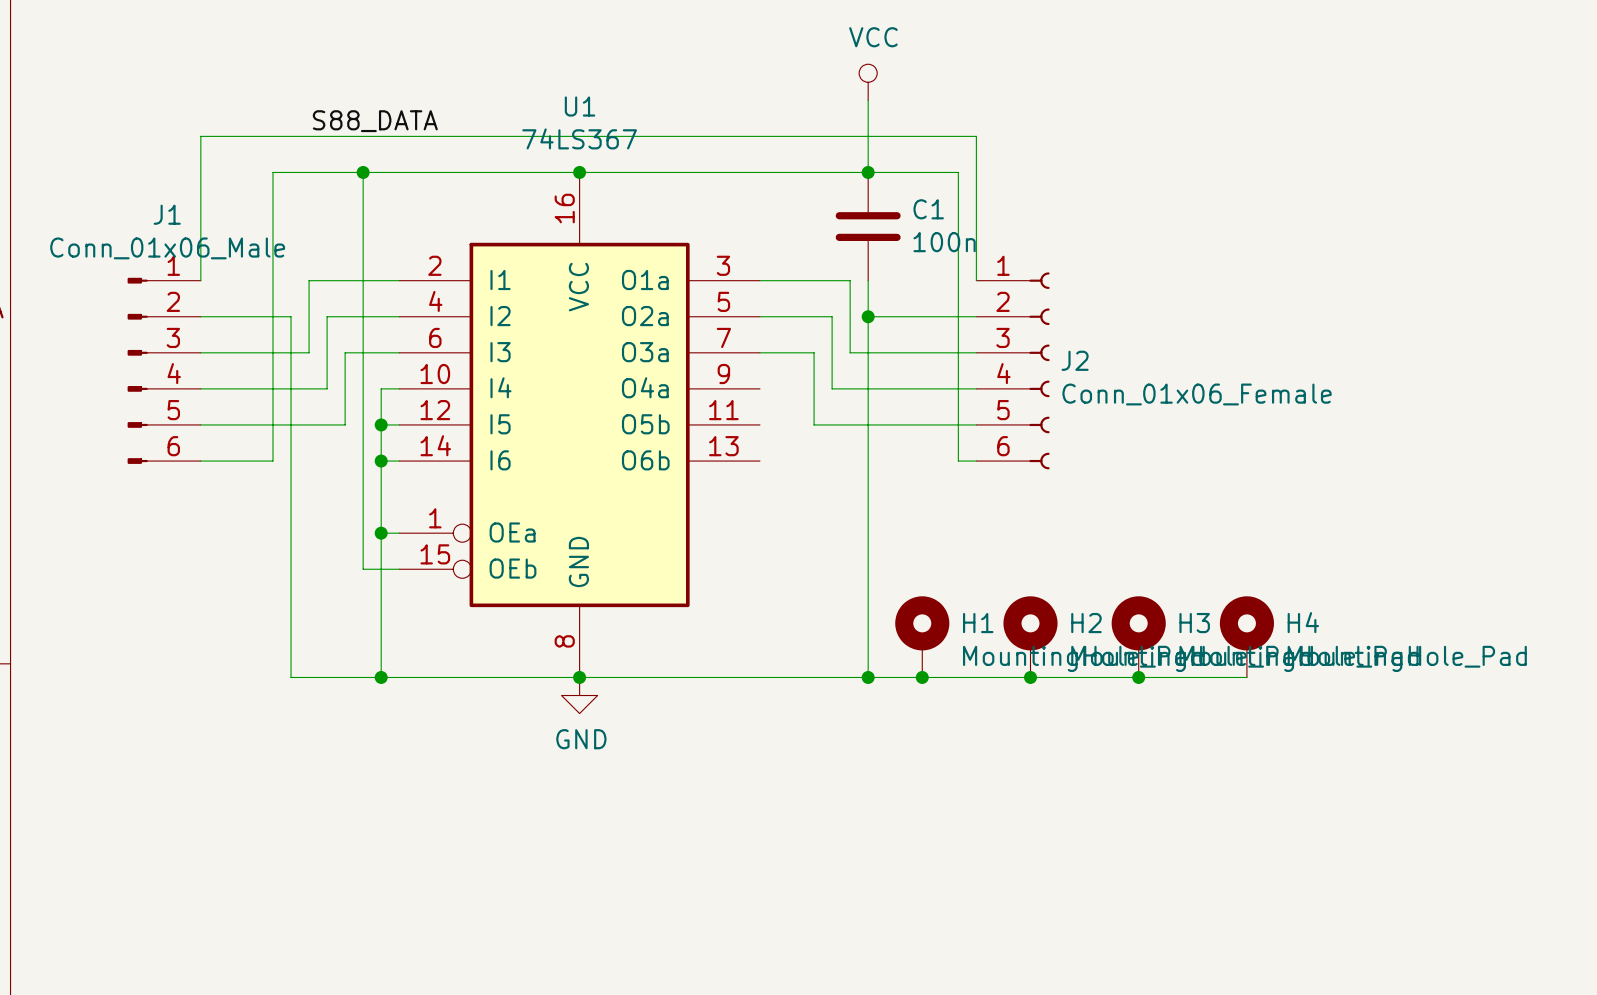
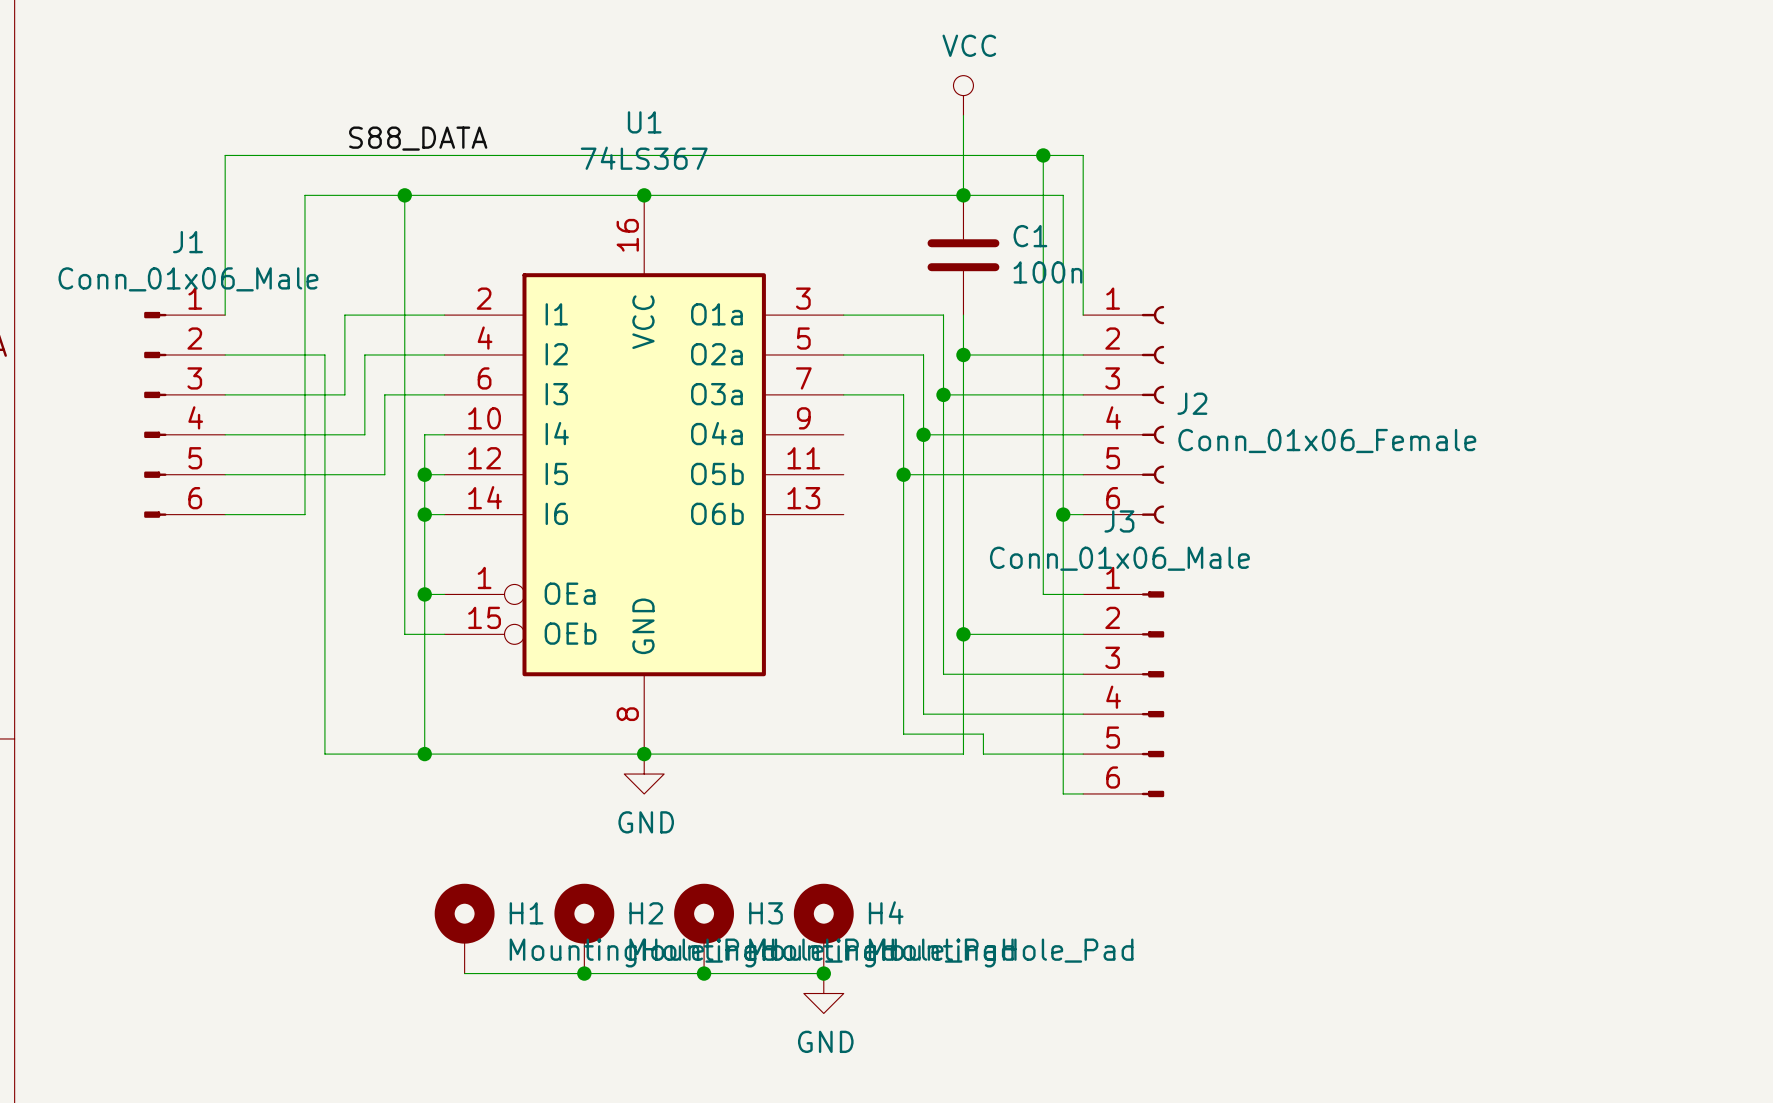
wire: none -> (1043, 155) (1043, 594) (1083, 594)
junction: none -> (1043, 155)
wire: none -> (943, 394) (943, 674) (1083, 674)
junction: none -> (943, 394)
wire: none -> (923, 434) (923, 714) (1083, 714)
junction: none -> (923, 434)
junction: none -> (903, 474)
wire: none -> (1063, 514) (1063, 793) (1083, 793)
junction: none -> (1063, 514)
wire: none -> (963, 634) (1083, 634)
junction: none -> (963, 634)
J3: none -> Conn_01x06_Male (1123, 694)
H1 position: (922, 636) -> (464, 928)
H2 position: (1030, 636) -> (584, 928)
H3 position: (1138, 636) -> (704, 928)
H4 position: (1246, 636) -> (823, 928)
wire: (868, 677) (886, 677) -> (903, 474) (903, 734) (983, 734) (983, 754)
junction: (868, 677) -> none
junction: (922, 677) -> none
wire: (976, 677) (1246, 677) -> none
junction: (1030, 677) -> none
junction: (1138, 677) -> none
wire: none -> (464, 973) (823, 973)
junction: none -> (584, 973)
junction: none -> (704, 973)
junction: none -> (823, 973)
power symbol: none -> GND (823, 993)

